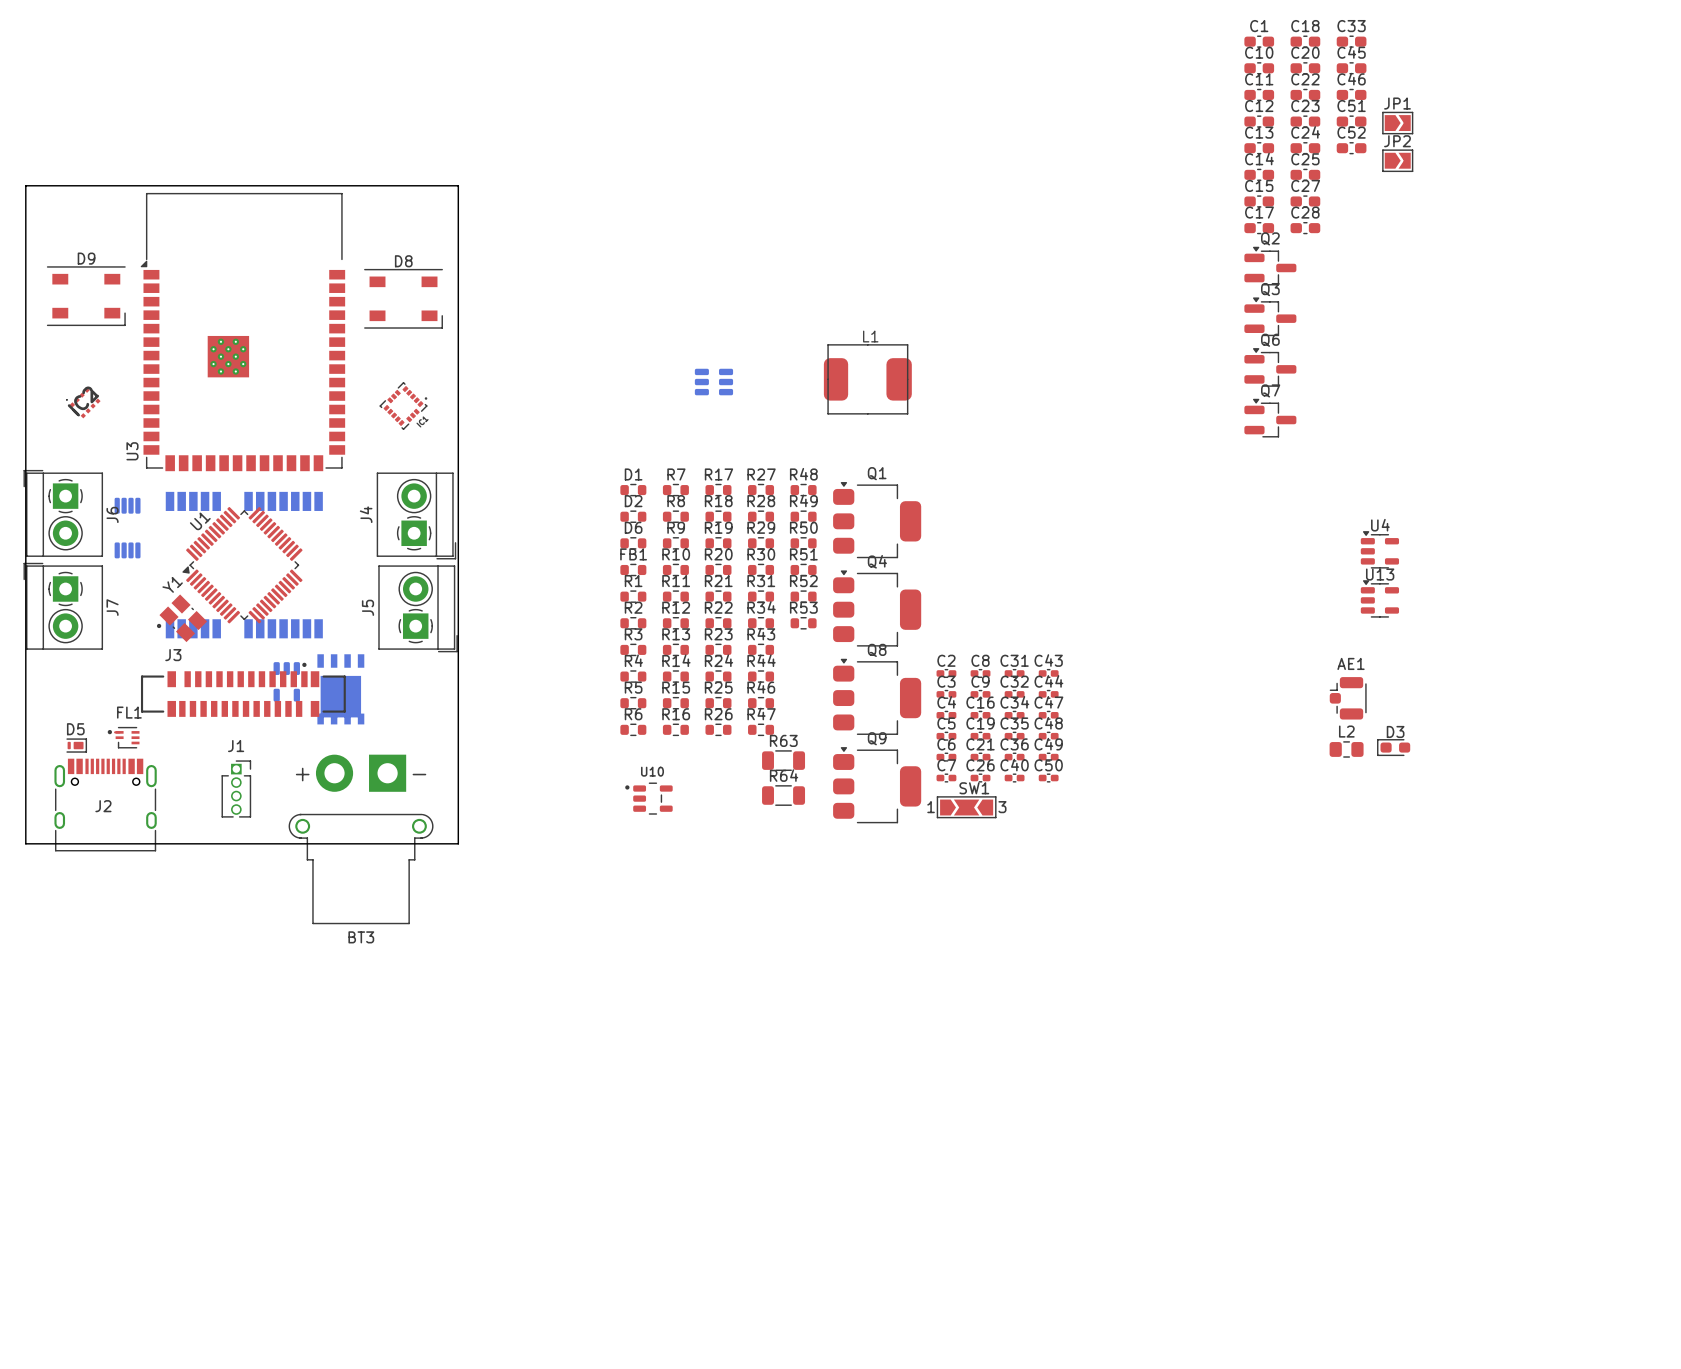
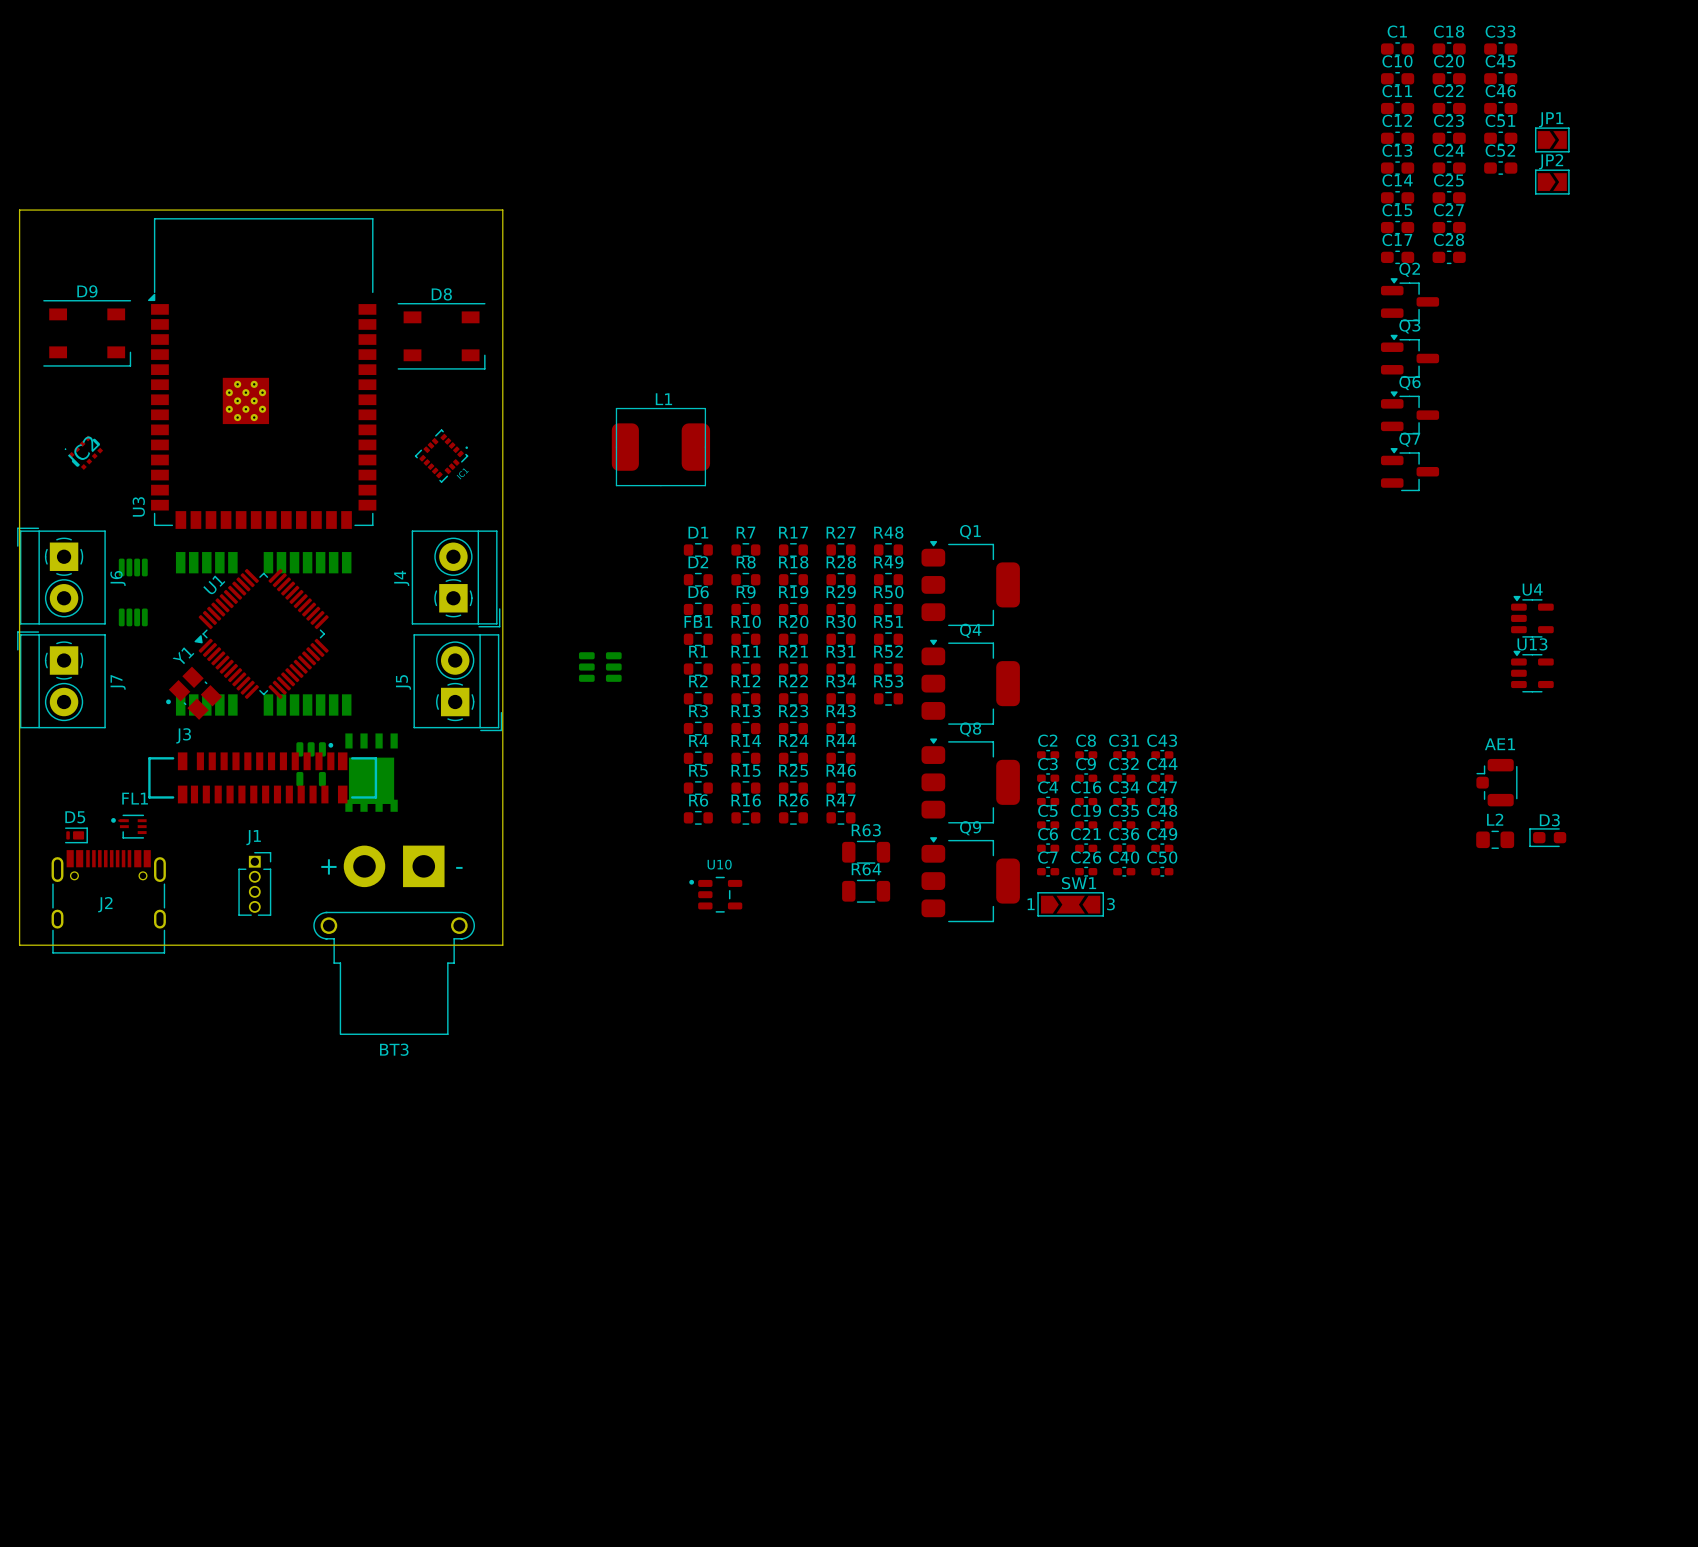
L1 position: (867, 379) -> (660, 447)
part: (713, 382) -> none
part: none -> (600, 667)

